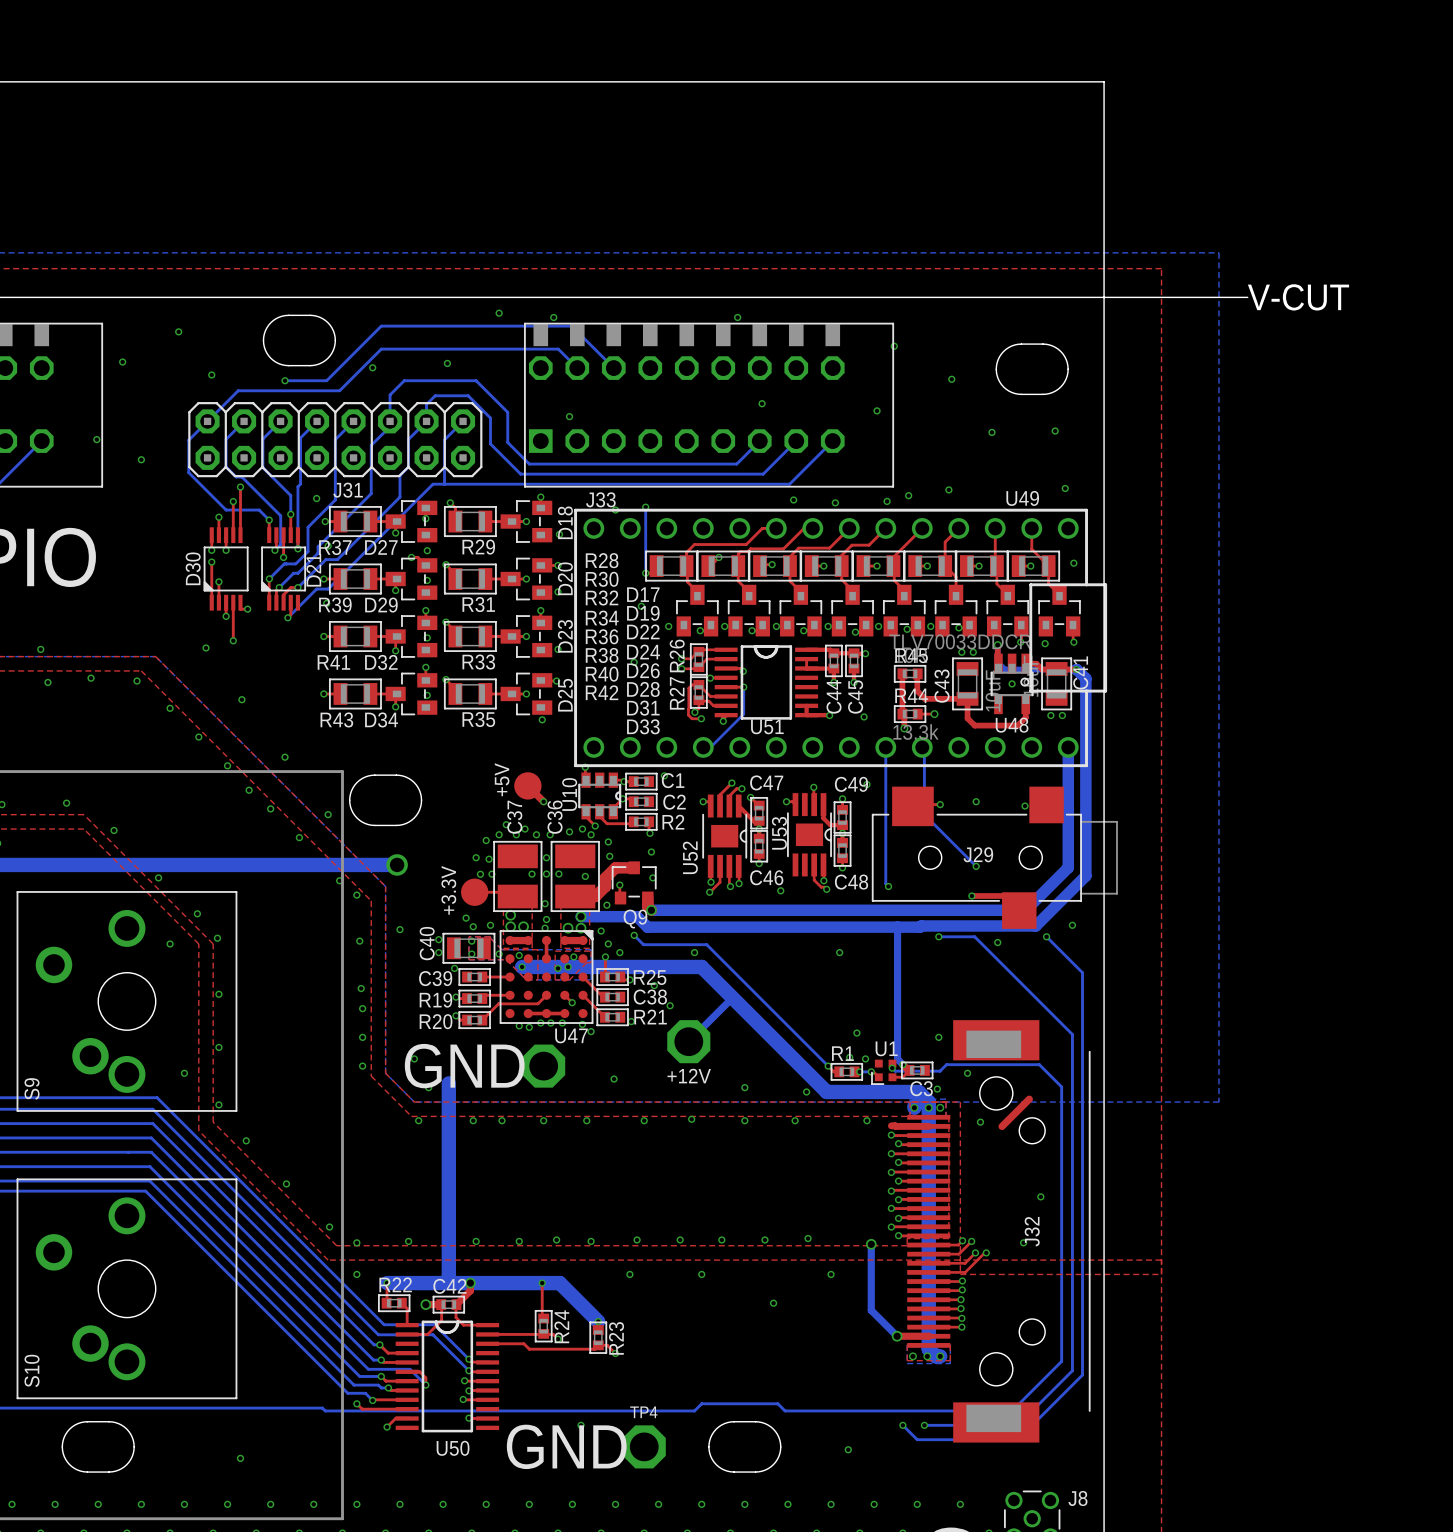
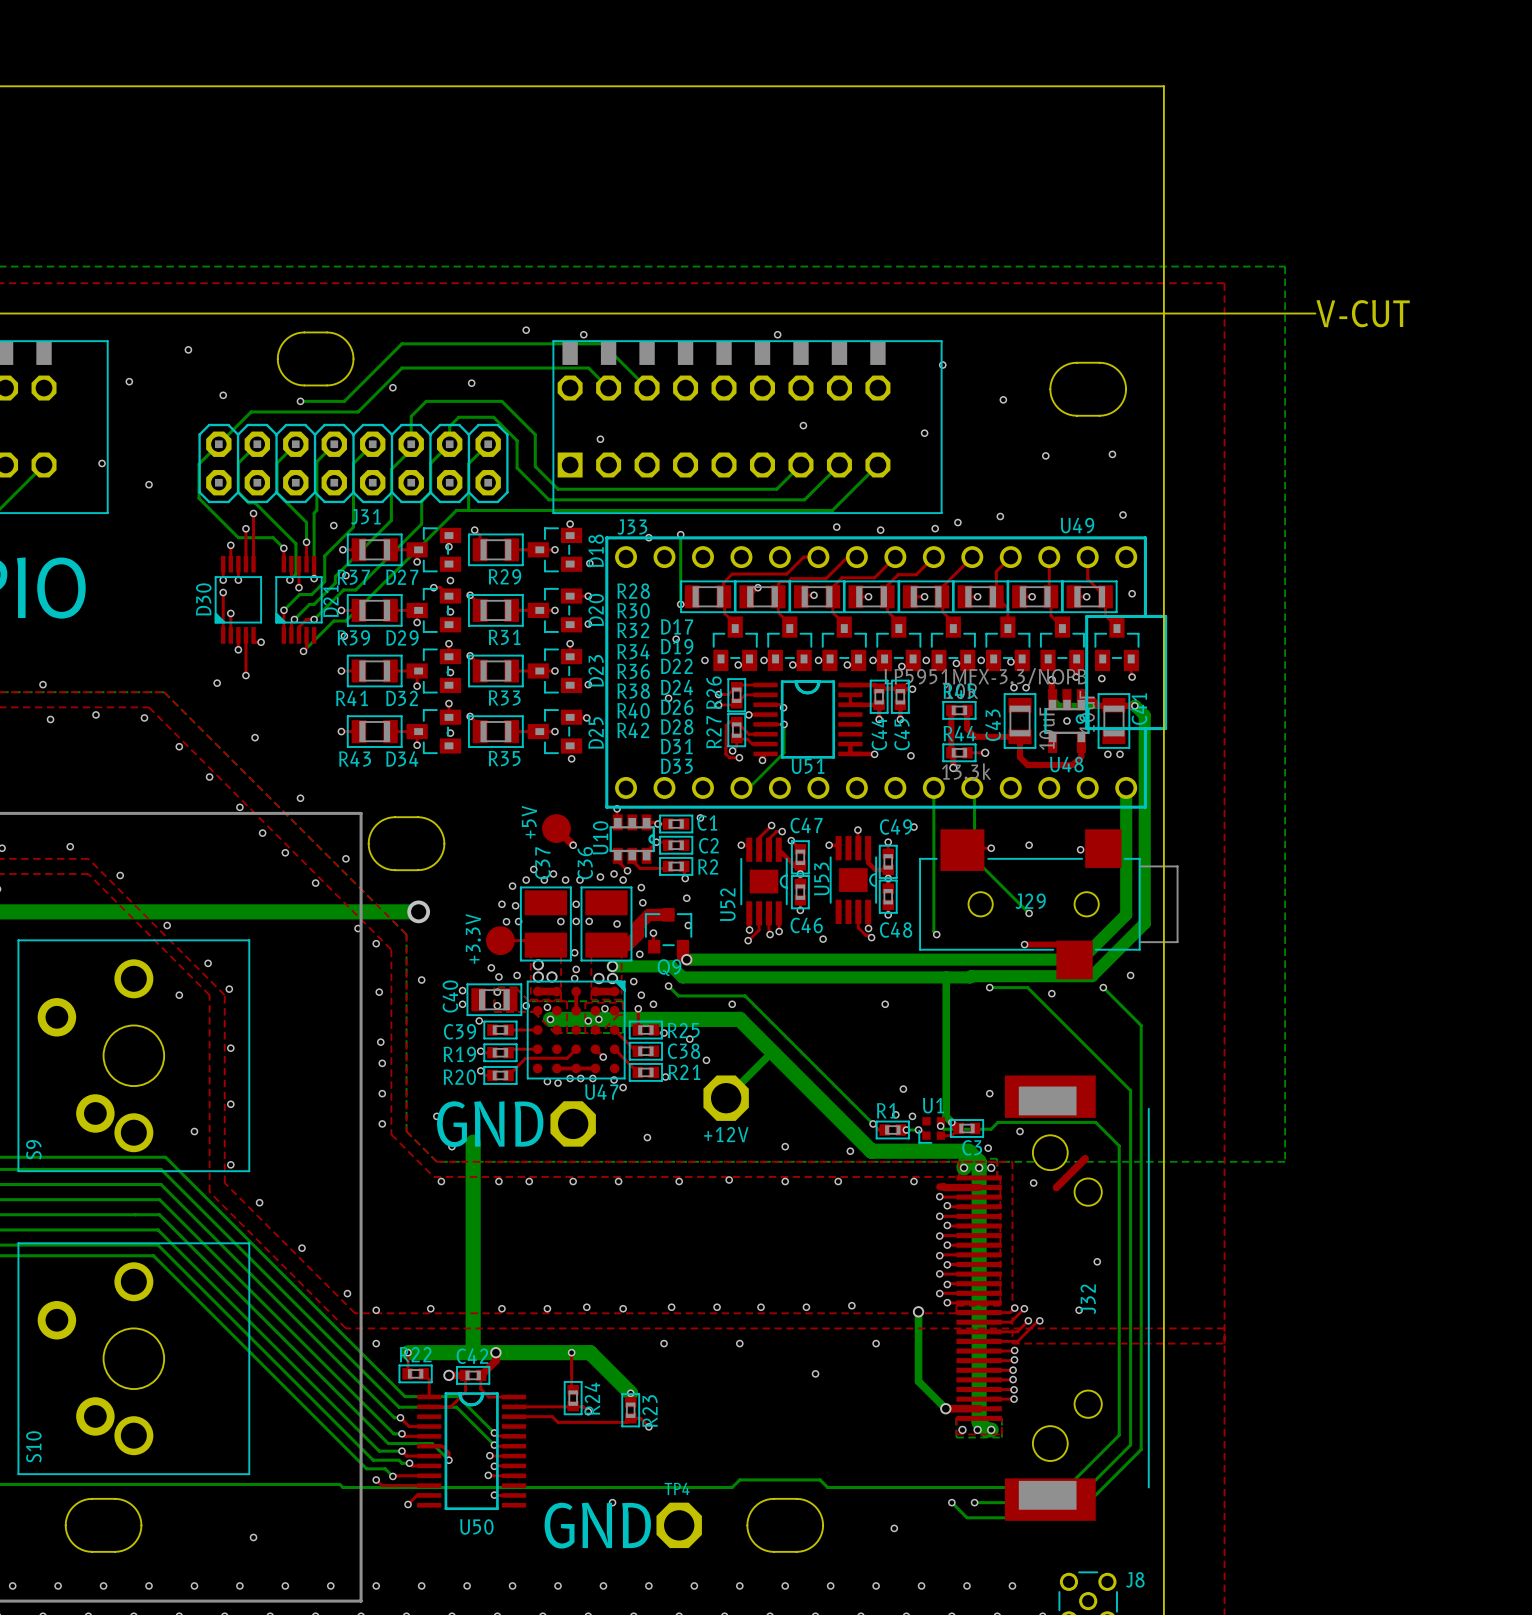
U48 value: TLV70033DDCR (960, 641) -> LP5951MFX-3.3/NOPB (985, 676)

